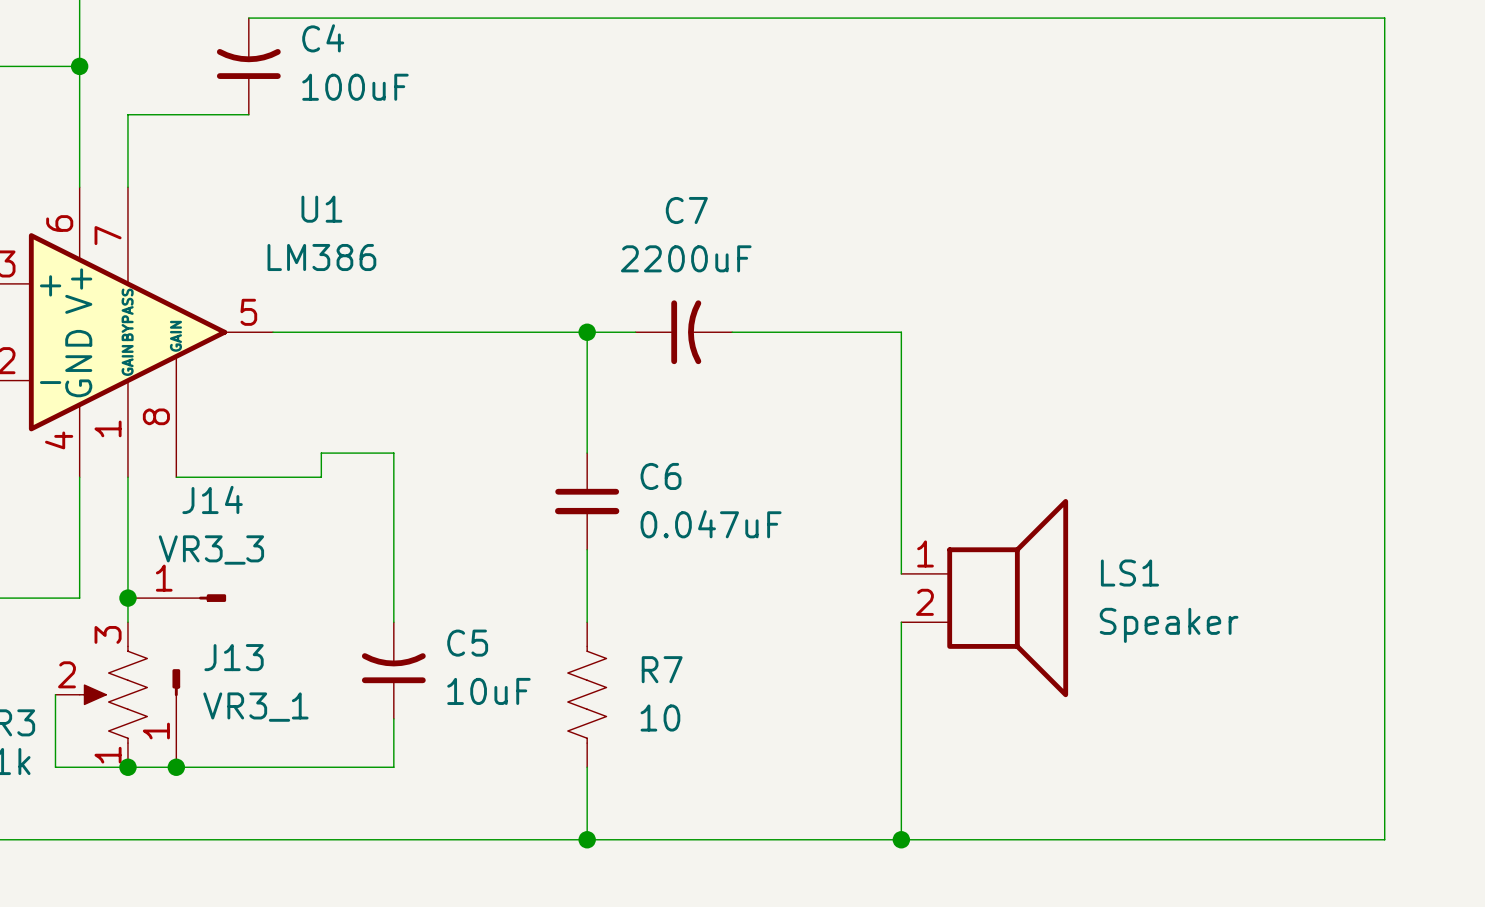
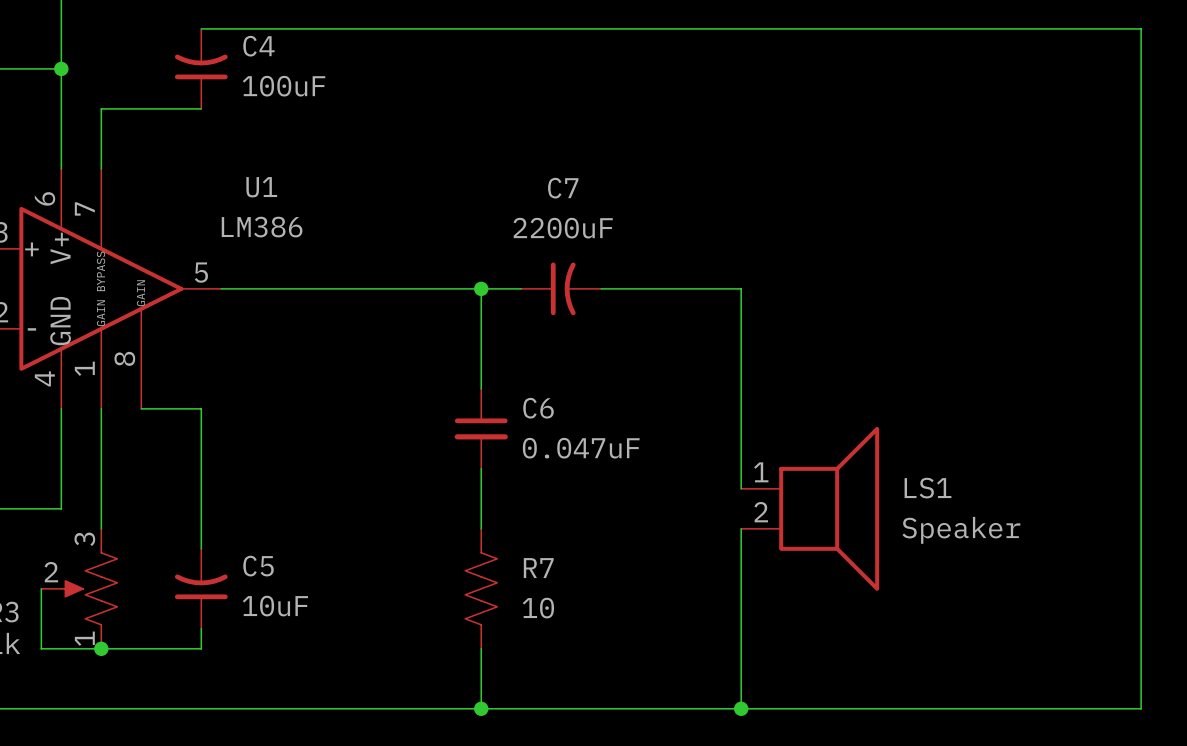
wire: (248, 477) (321, 477) (321, 453) (393, 453) (393, 622) -> (201, 408) (201, 548)
junction: (127, 598) -> none
J14: VR3_3 (177, 598) -> none
C5 position: (393, 670) -> (201, 588)
J13: VR3_1 (176, 718) -> none
wire: (393, 718) (393, 767) (248, 767) -> (201, 628) (201, 648)
junction: (176, 767) -> none

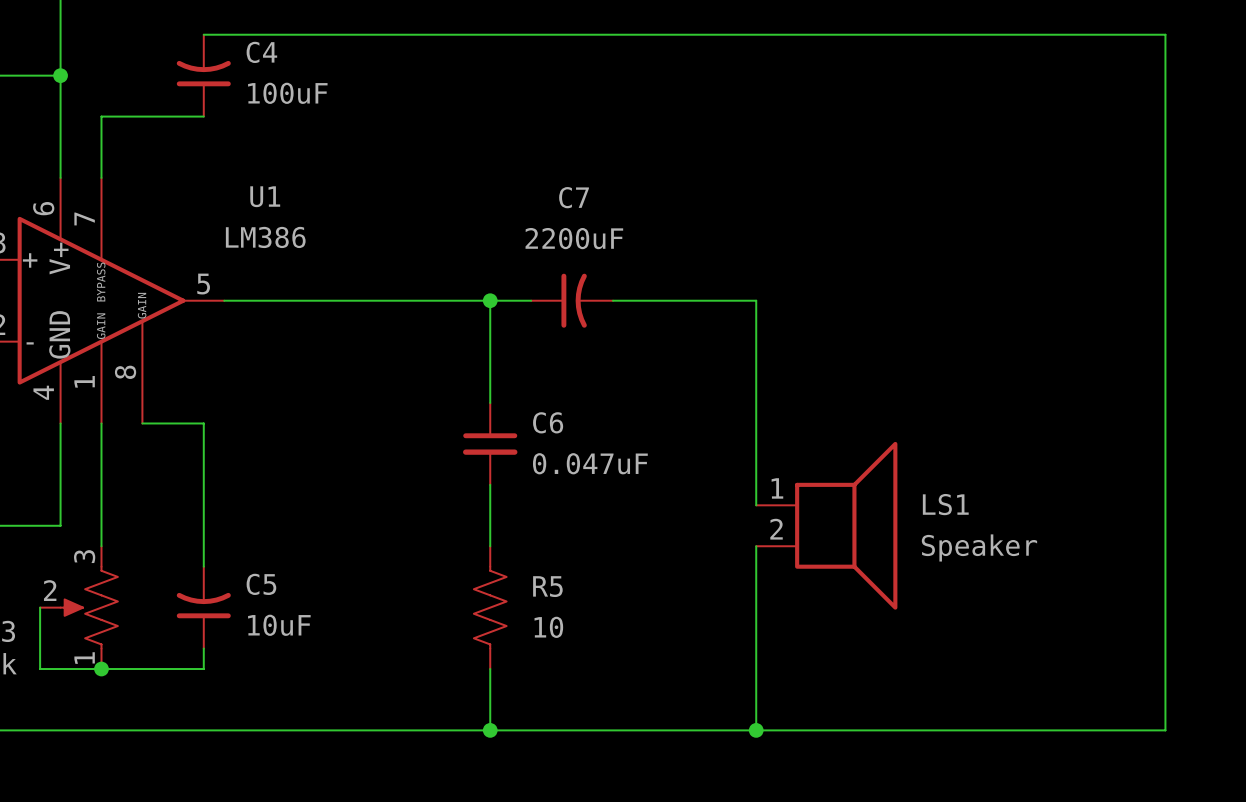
R7 name: R7 (538, 568) -> R5 (547, 586)

